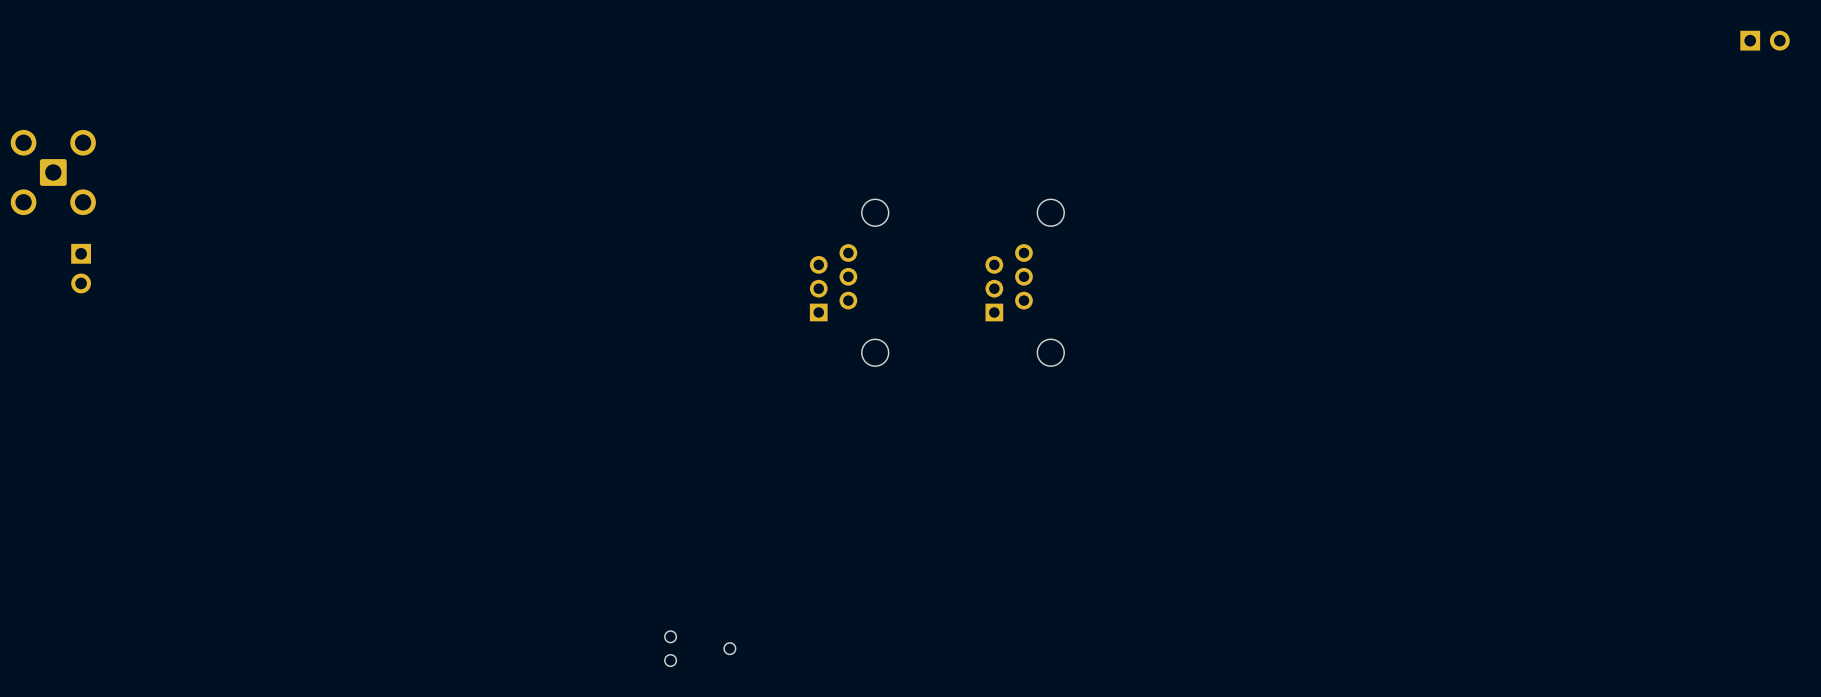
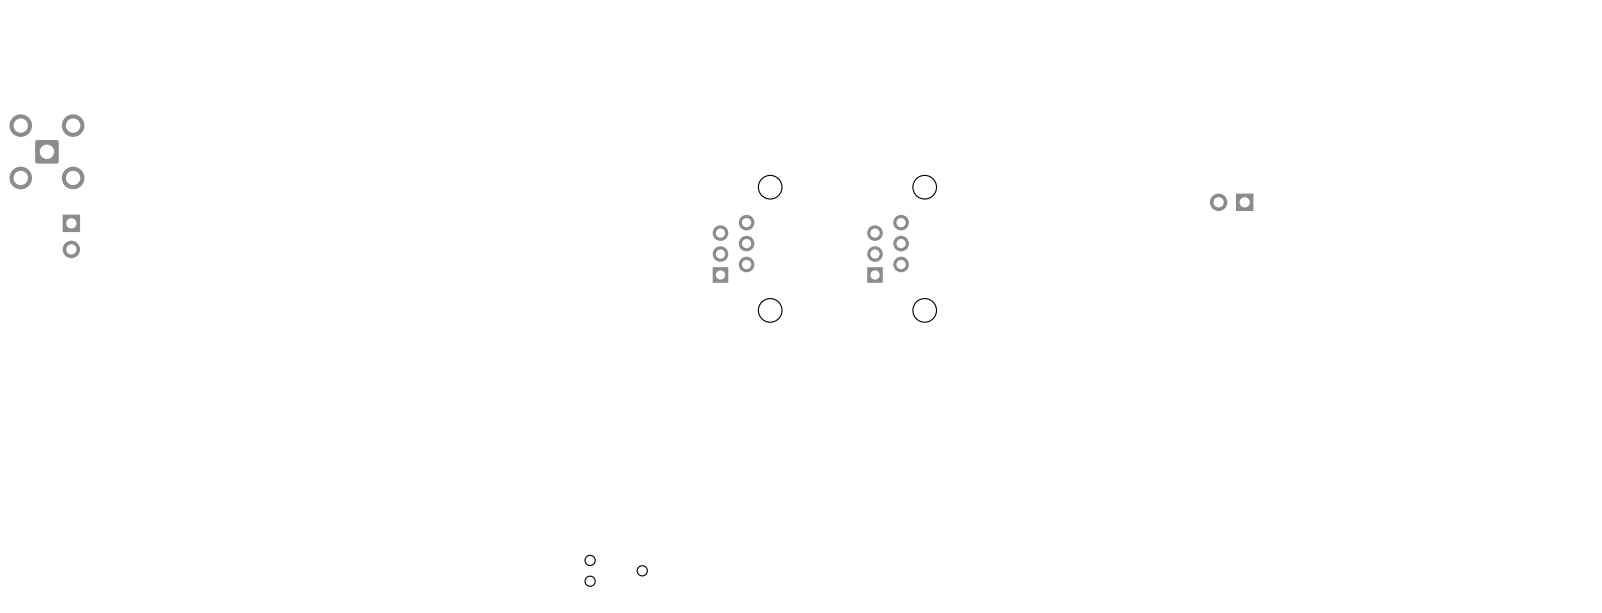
part: (1765, 40) -> none
part: none -> (1231, 202)

